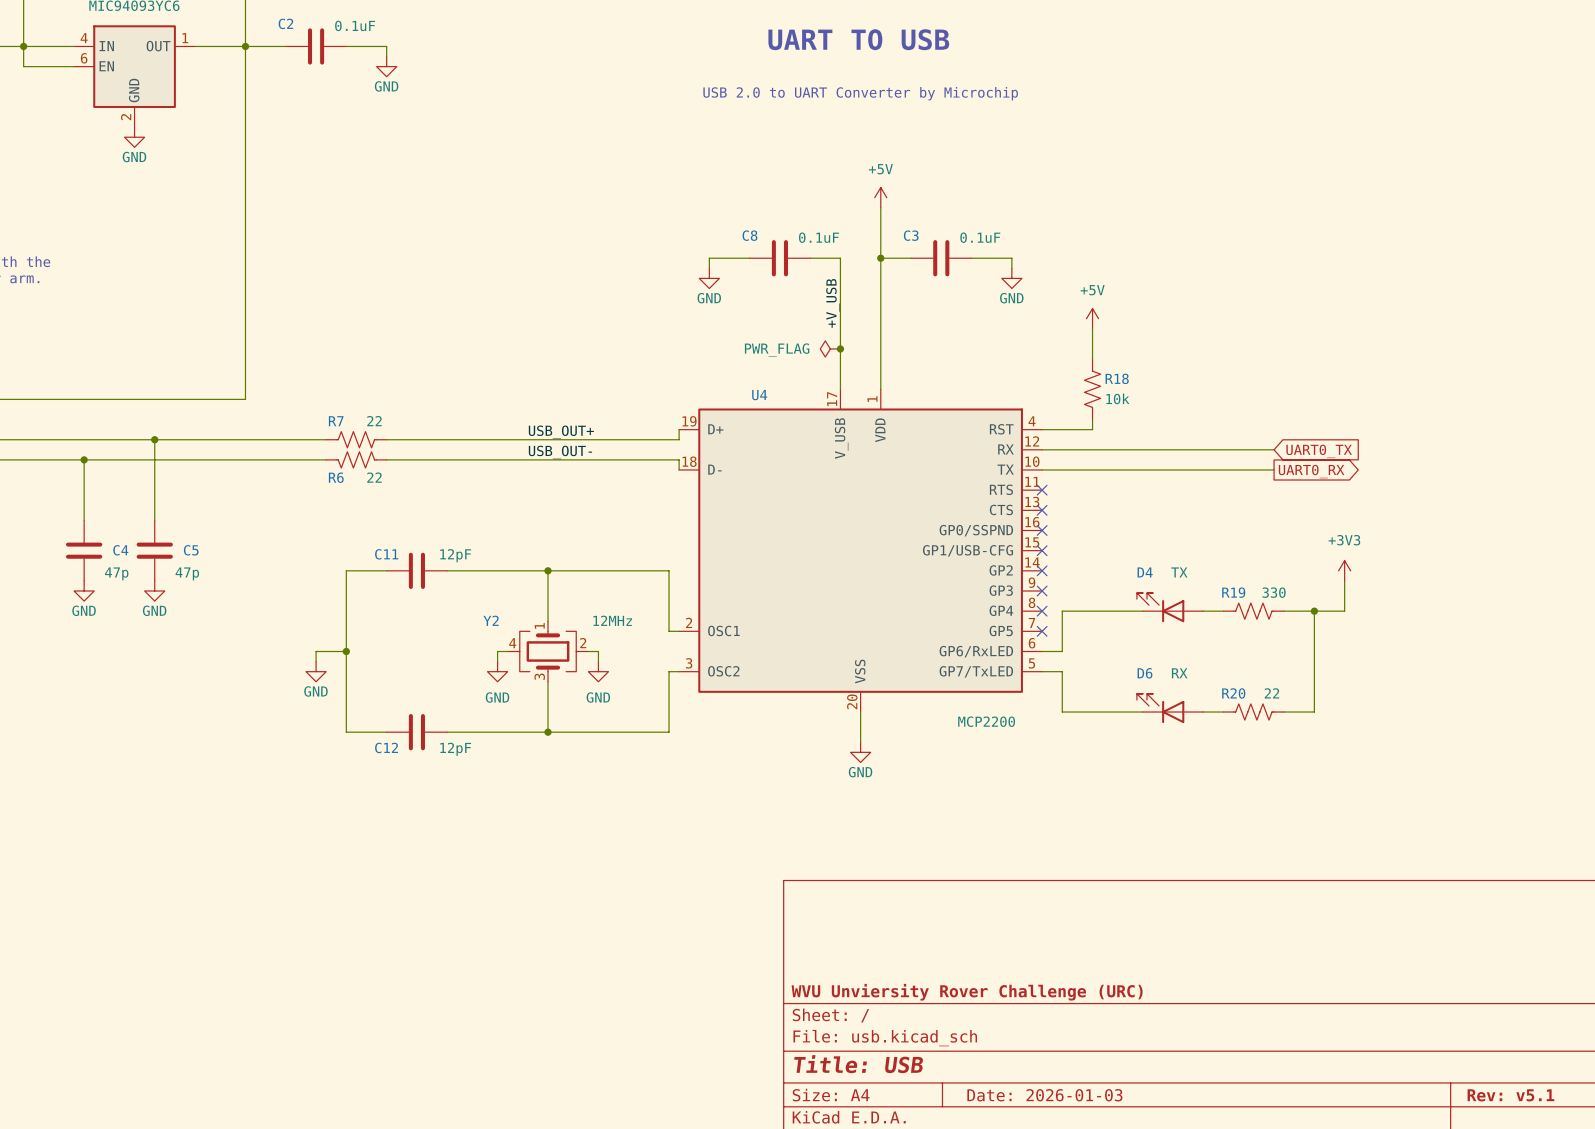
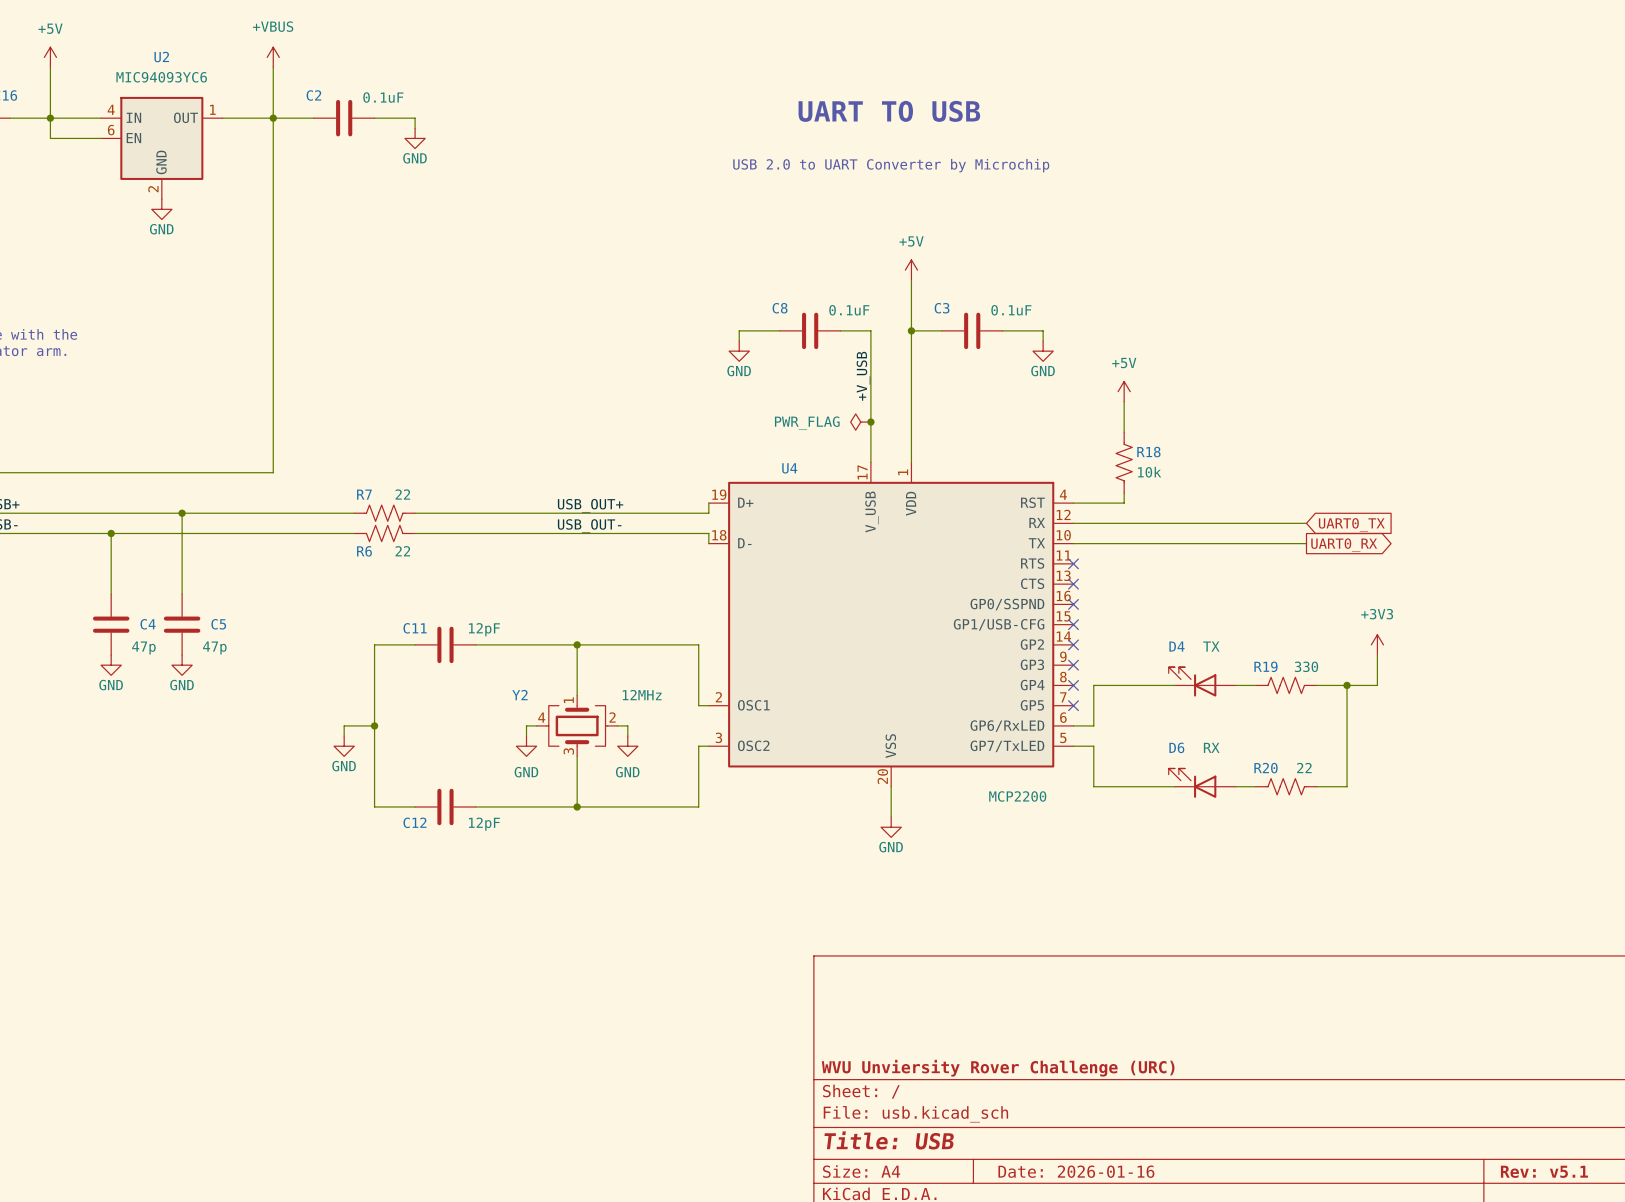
title block: Date: 2026-01-03 (1044, 1095) -> Date: 2026-01-16 (1076, 1171)

